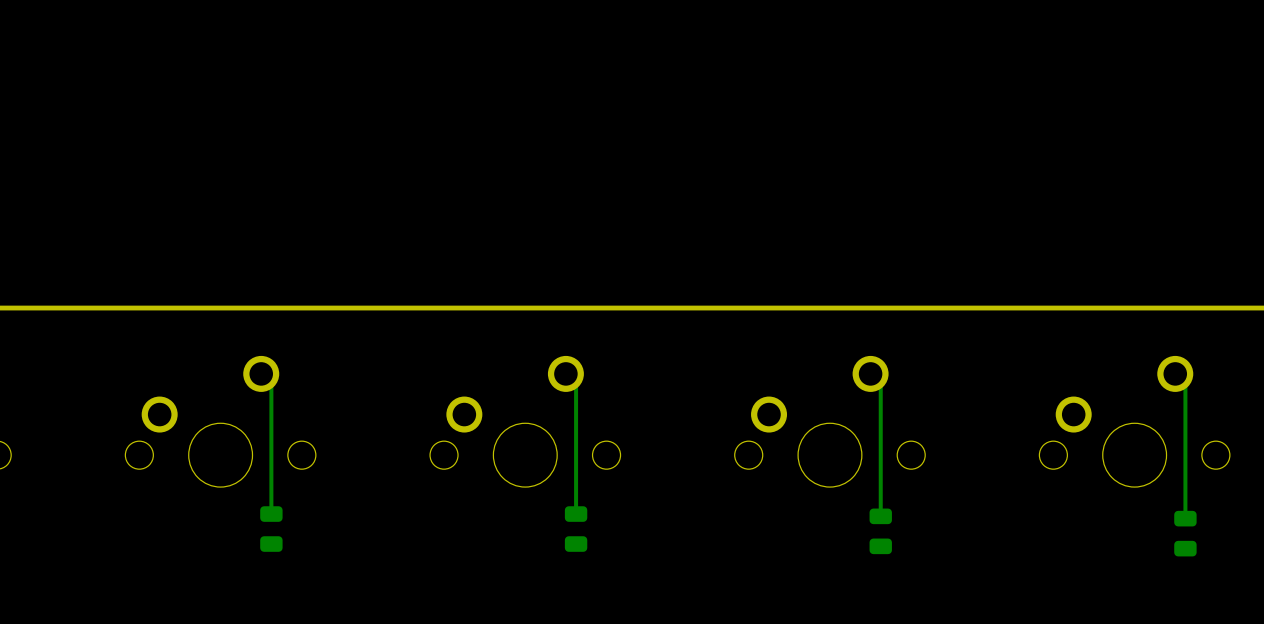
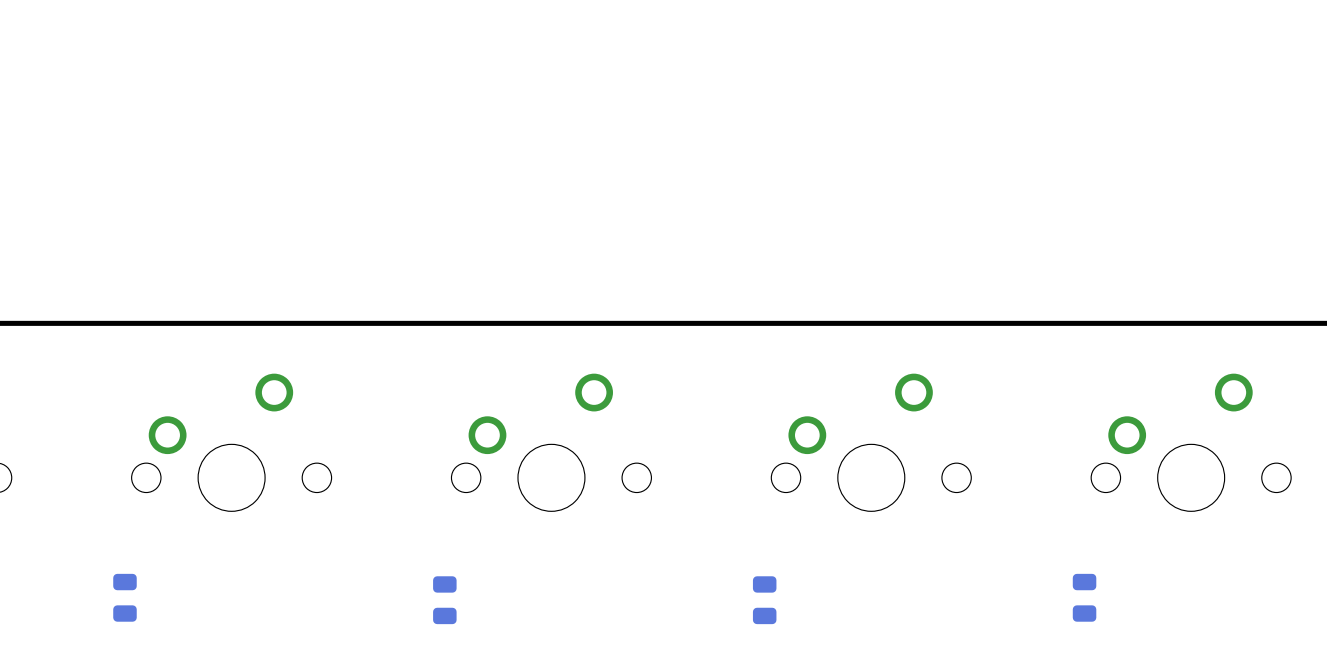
bottom track: (261, 373) (271, 384) (271, 514) -> none
bottom track: (565, 373) (576, 384) (576, 514) -> none
bottom track: (870, 373) (880, 384) (880, 516) -> none
bottom track: (1175, 373) (1185, 384) (1185, 518) -> none
part: (271, 529) -> none
part: (576, 529) -> none
part: (880, 531) -> none
part: (1185, 533) -> none
part: none -> (124, 597)
part: none -> (1084, 597)
part: none -> (444, 600)
part: none -> (764, 600)

